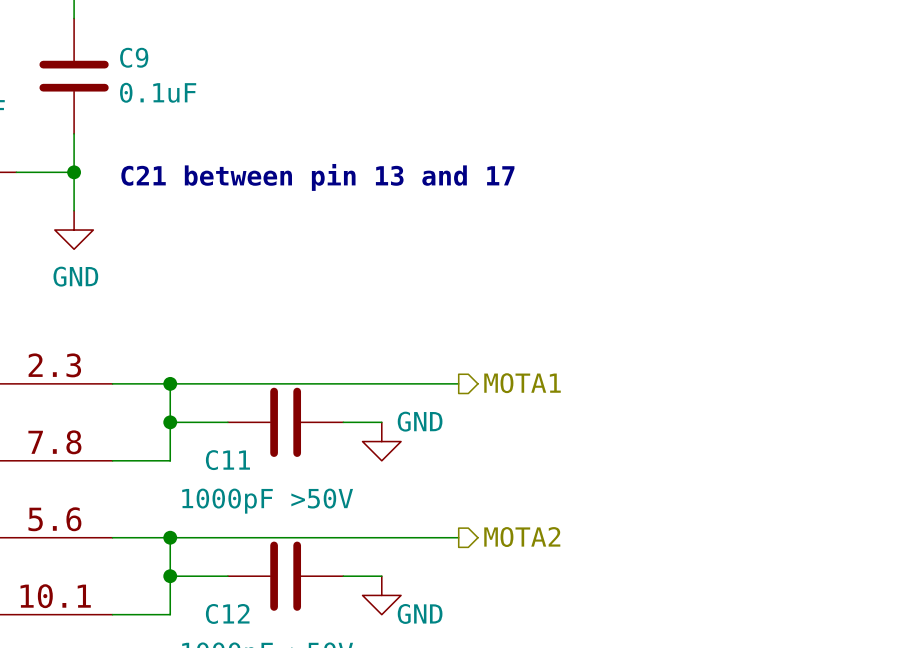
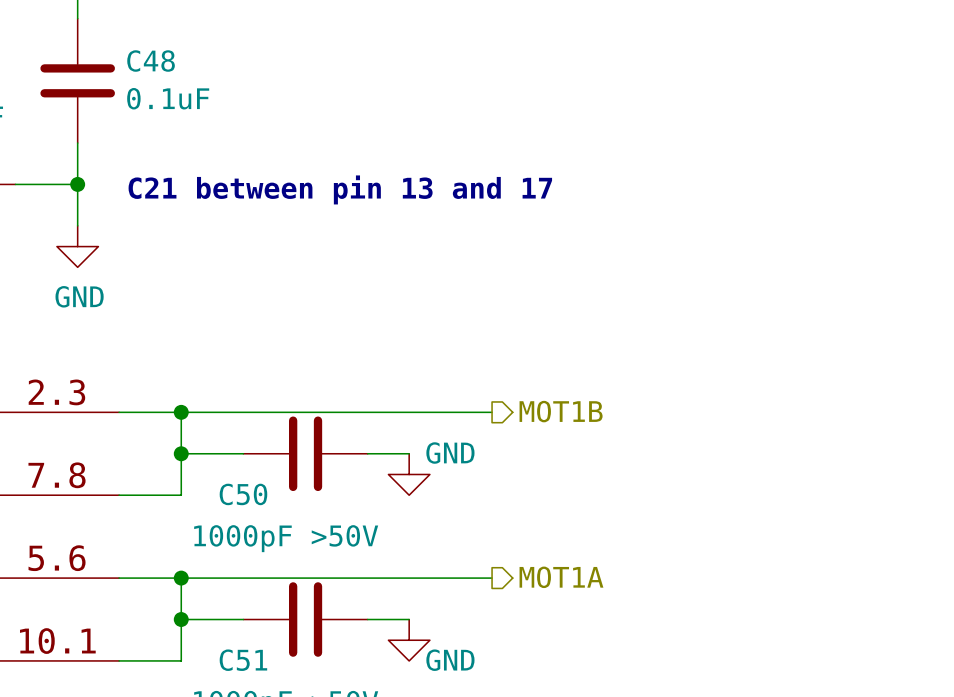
C9 name: C9 (134, 57) -> C48 (151, 61)
hierarchical label: MOTA1 (522, 383) -> MOT1B (561, 411)
C11 name: C11 (227, 460) -> C50 (243, 494)
hierarchical label: MOTA2 (522, 537) -> MOT1A (561, 577)
C12 name: C12 (227, 613) -> C51 (243, 660)

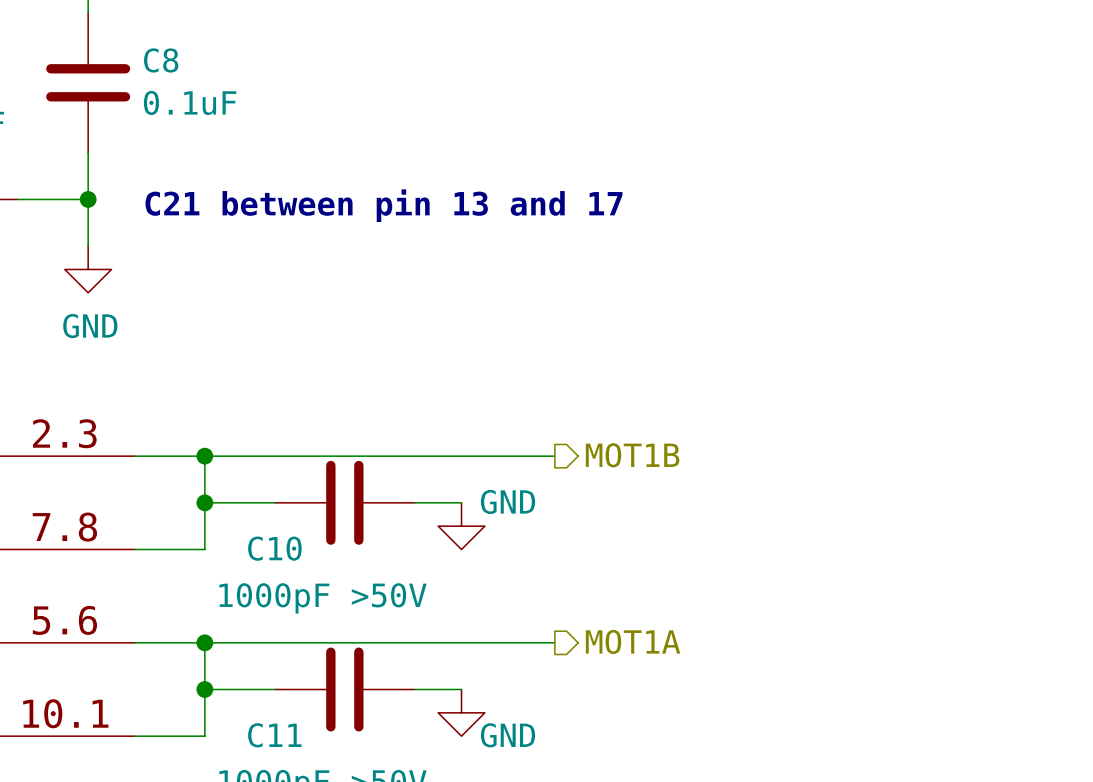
C48 name: C48 (151, 61) -> C8 (161, 60)
C50 name: C50 (243, 494) -> C10 (274, 548)
C51 name: C51 (243, 660) -> C11 (274, 735)

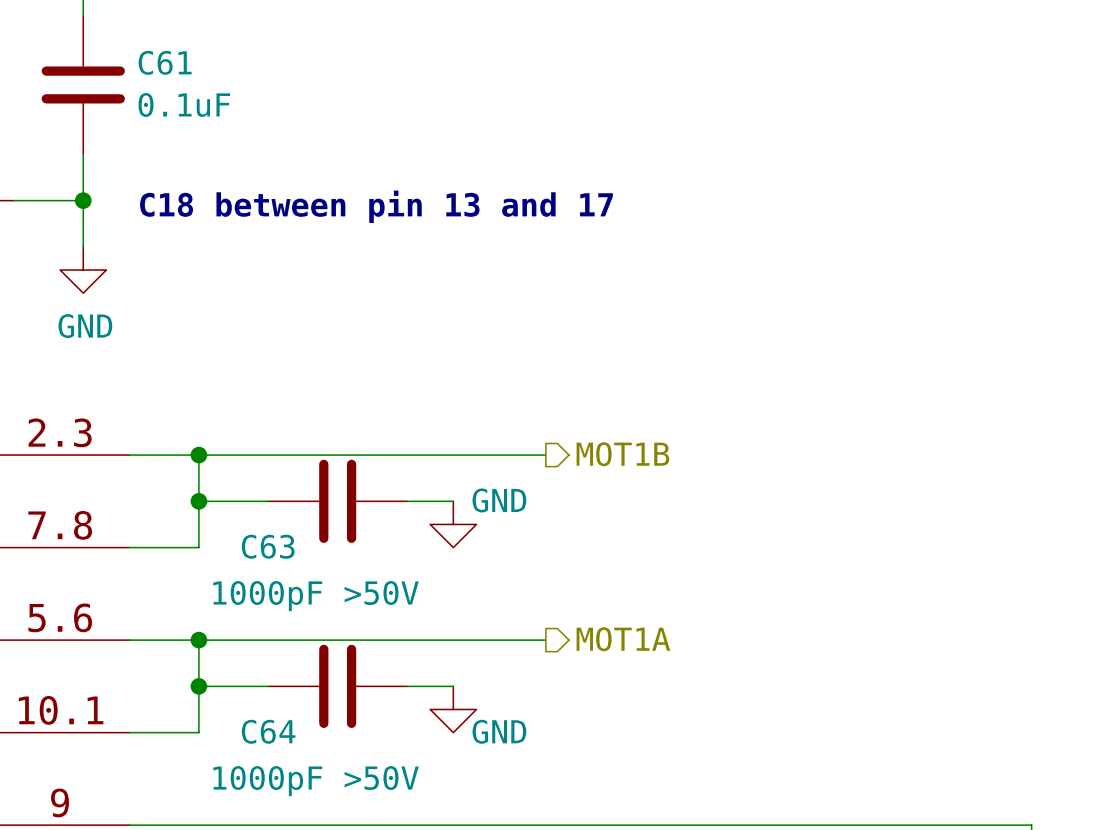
C8 name: C8 (161, 60) -> C61 (165, 62)
text: C21 between pin 13 and 17 (383, 205) -> C18 between pin 13 and 17 (376, 206)
C10 name: C10 (274, 548) -> C63 (268, 546)
C11 name: C11 (274, 735) -> C64 (268, 731)

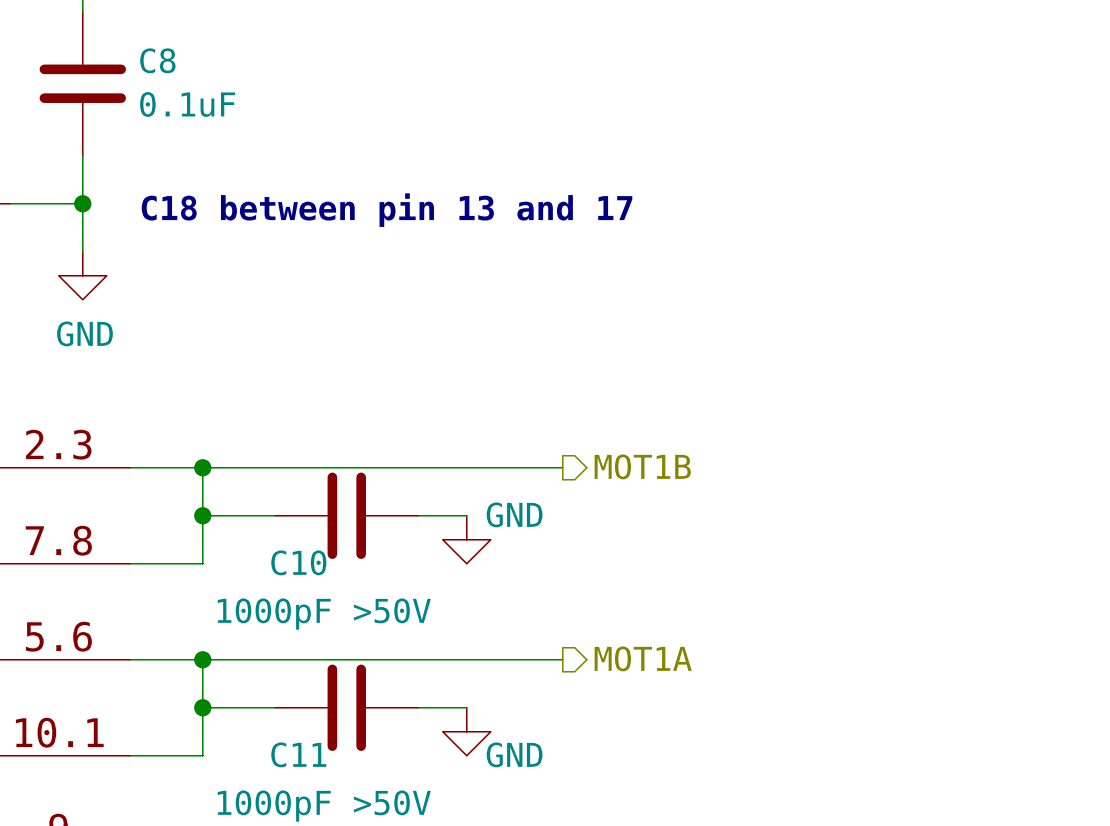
C61 name: C61 (165, 62) -> C8 (157, 60)
C63 name: C63 (268, 546) -> C10 (298, 562)
C64 name: C64 (268, 731) -> C11 (298, 754)

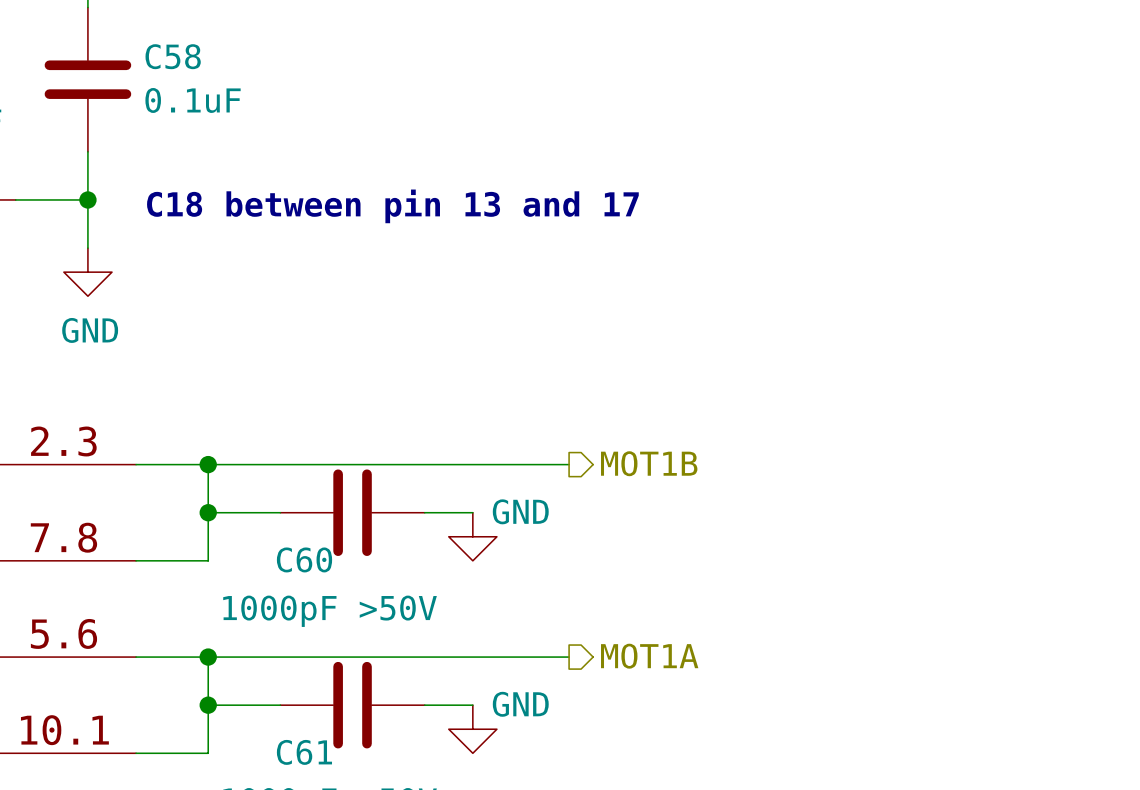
C8 name: C8 (157, 60) -> C58 (173, 56)
C10 name: C10 (298, 562) -> C60 (304, 559)
C11 name: C11 (298, 754) -> C61 (304, 752)
power symbol text position: GND (514, 754) -> GND (520, 704)

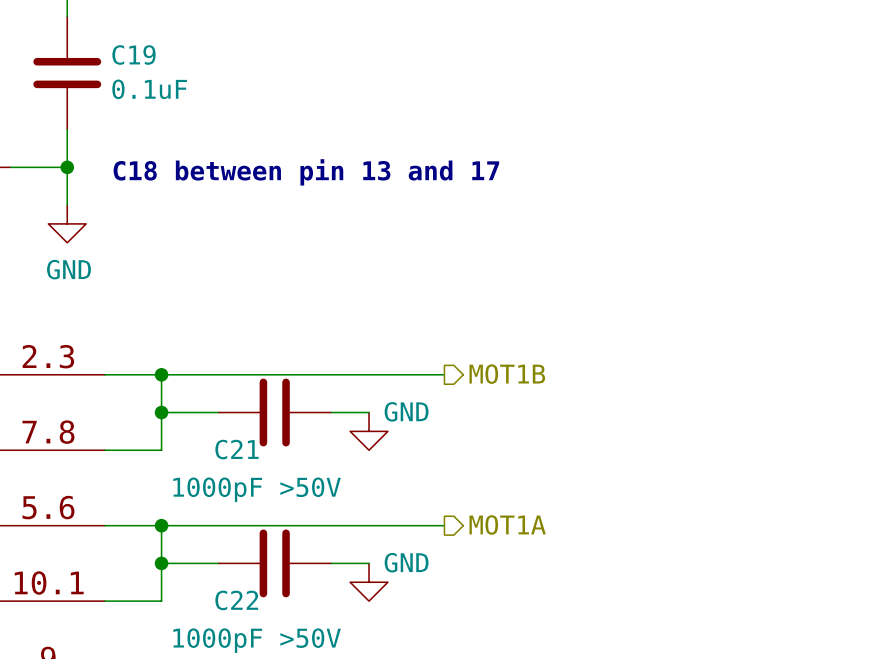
C58 name: C58 (173, 56) -> C19 (134, 55)
C60 name: C60 (304, 559) -> C21 (237, 449)
C61 name: C61 (304, 752) -> C22 (236, 600)

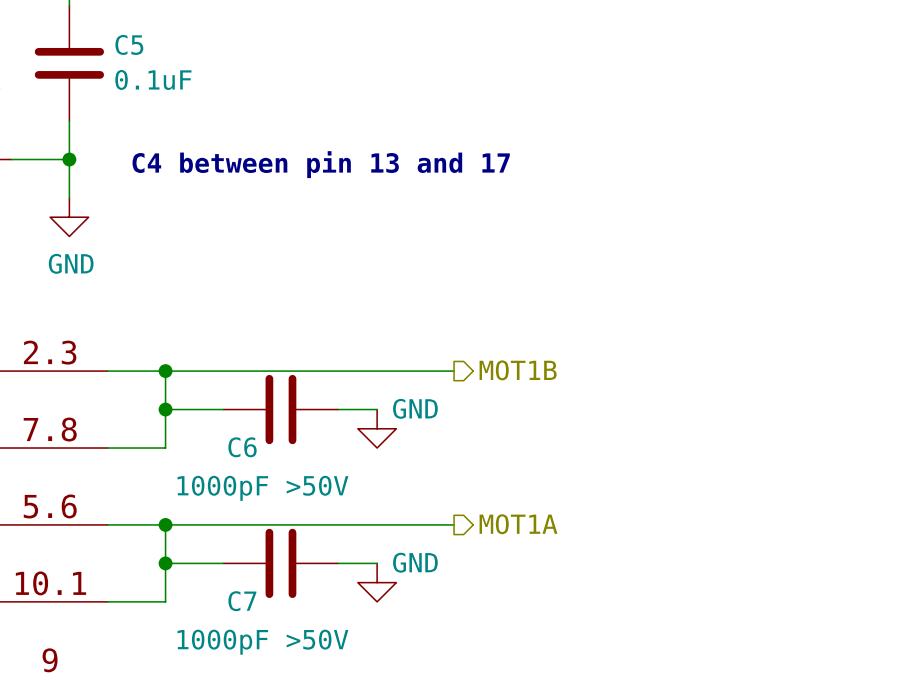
C19 name: C19 (134, 55) -> C5 (129, 44)
text: C18 between pin 13 and 17 (306, 172) -> C4 between pin 13 and 17 (321, 164)
C21 name: C21 (237, 449) -> C6 (242, 447)
C22 name: C22 (236, 600) -> C7 (242, 601)

